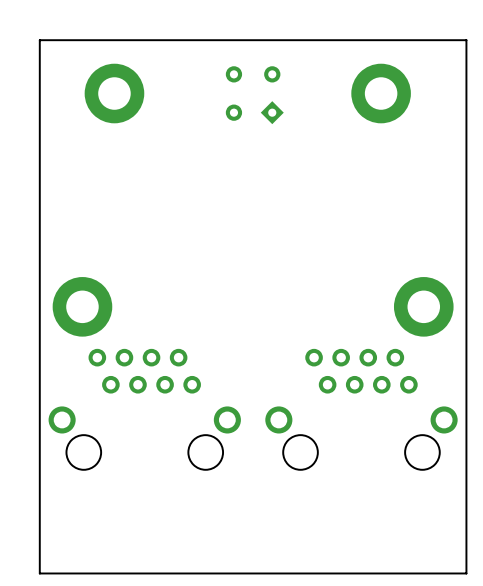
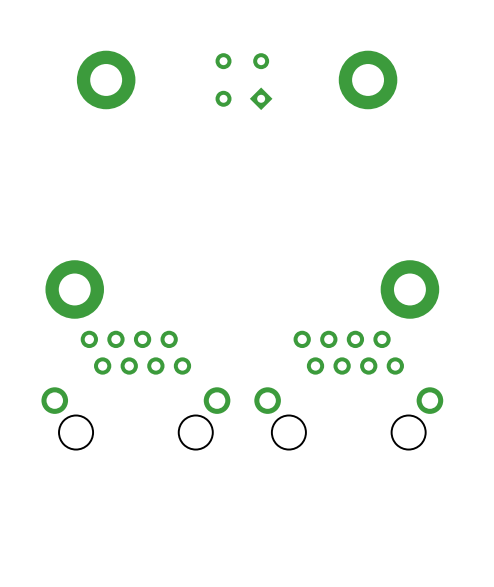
board edge: (466, 40) (466, 573) (39, 573) (39, 40) (466, 40) -> none

